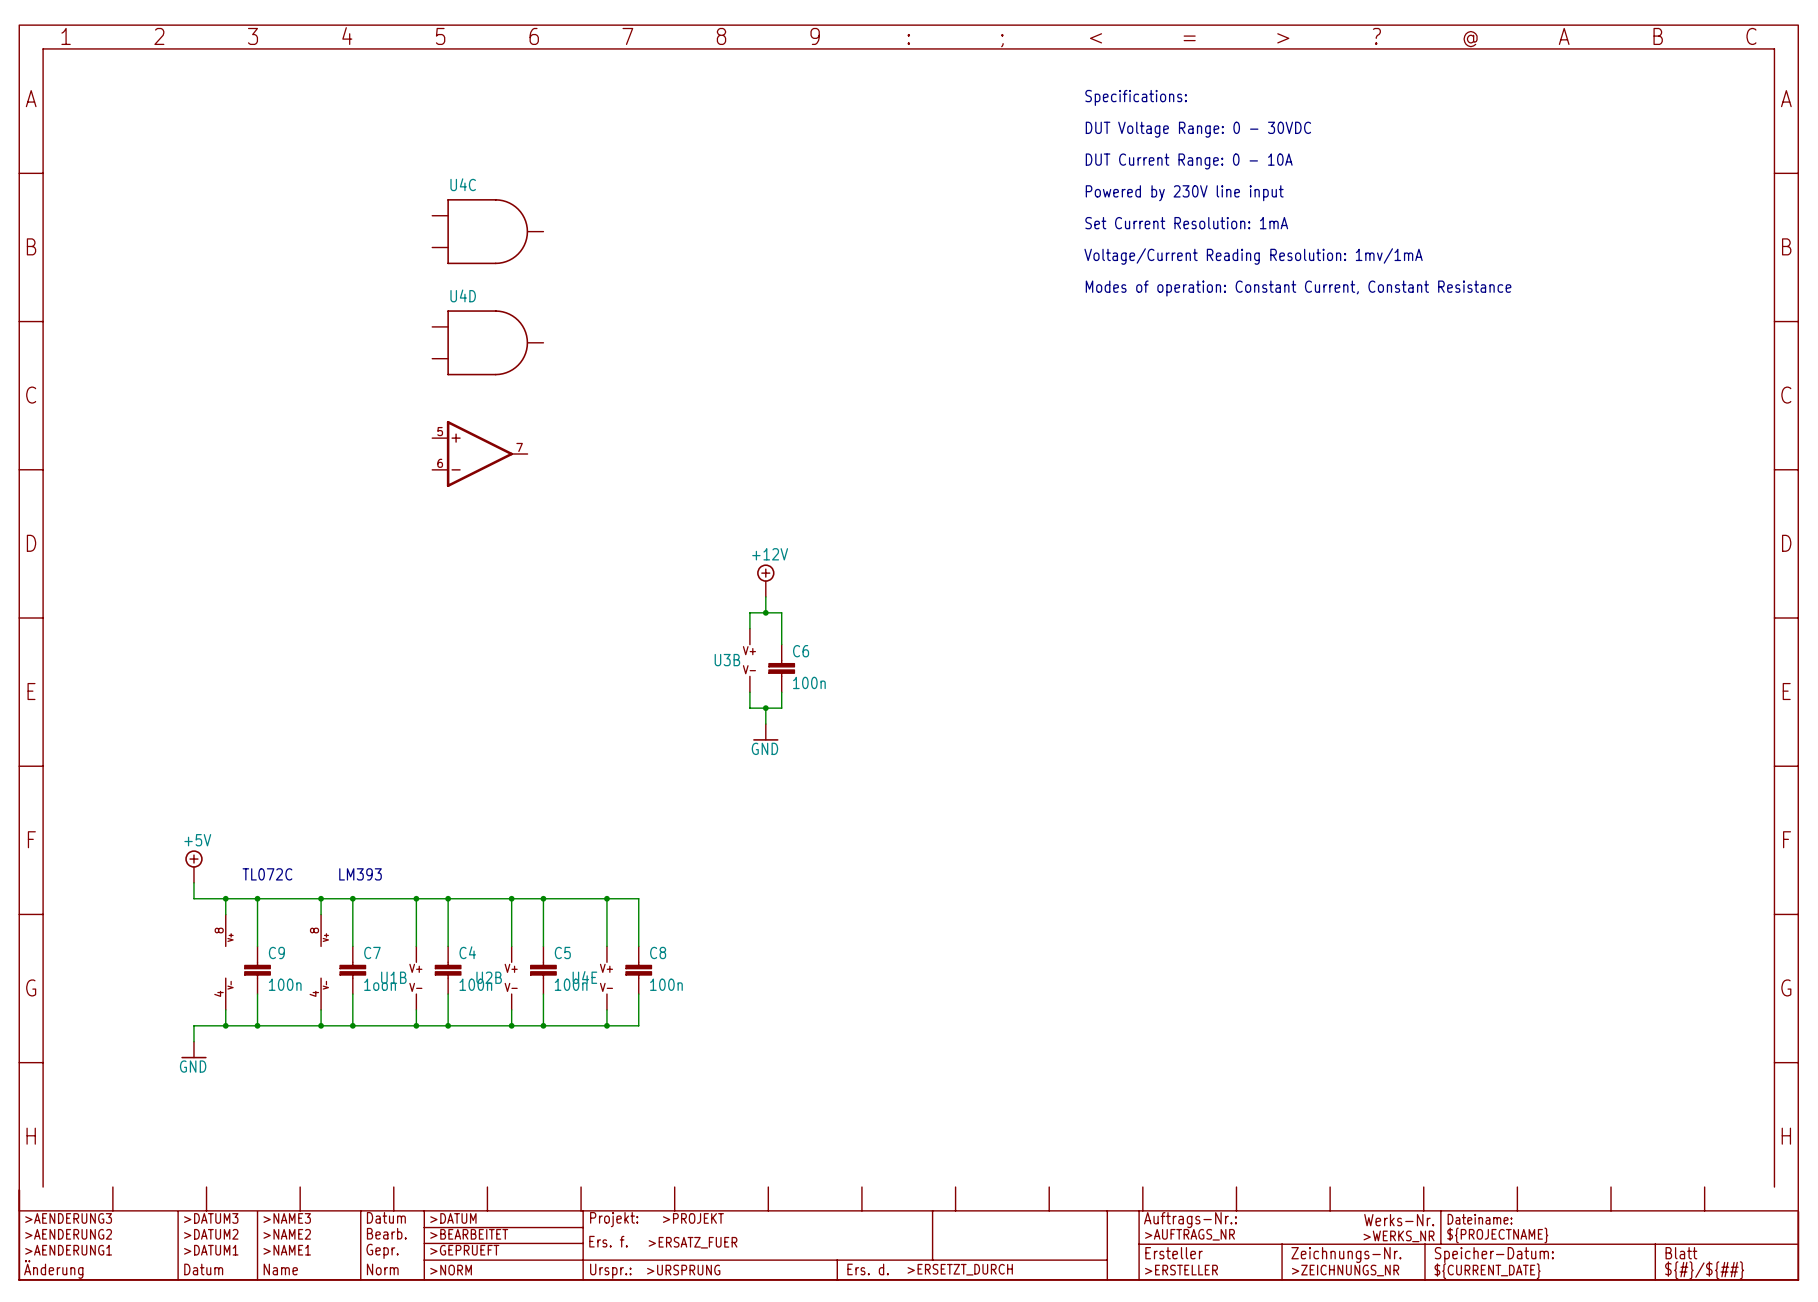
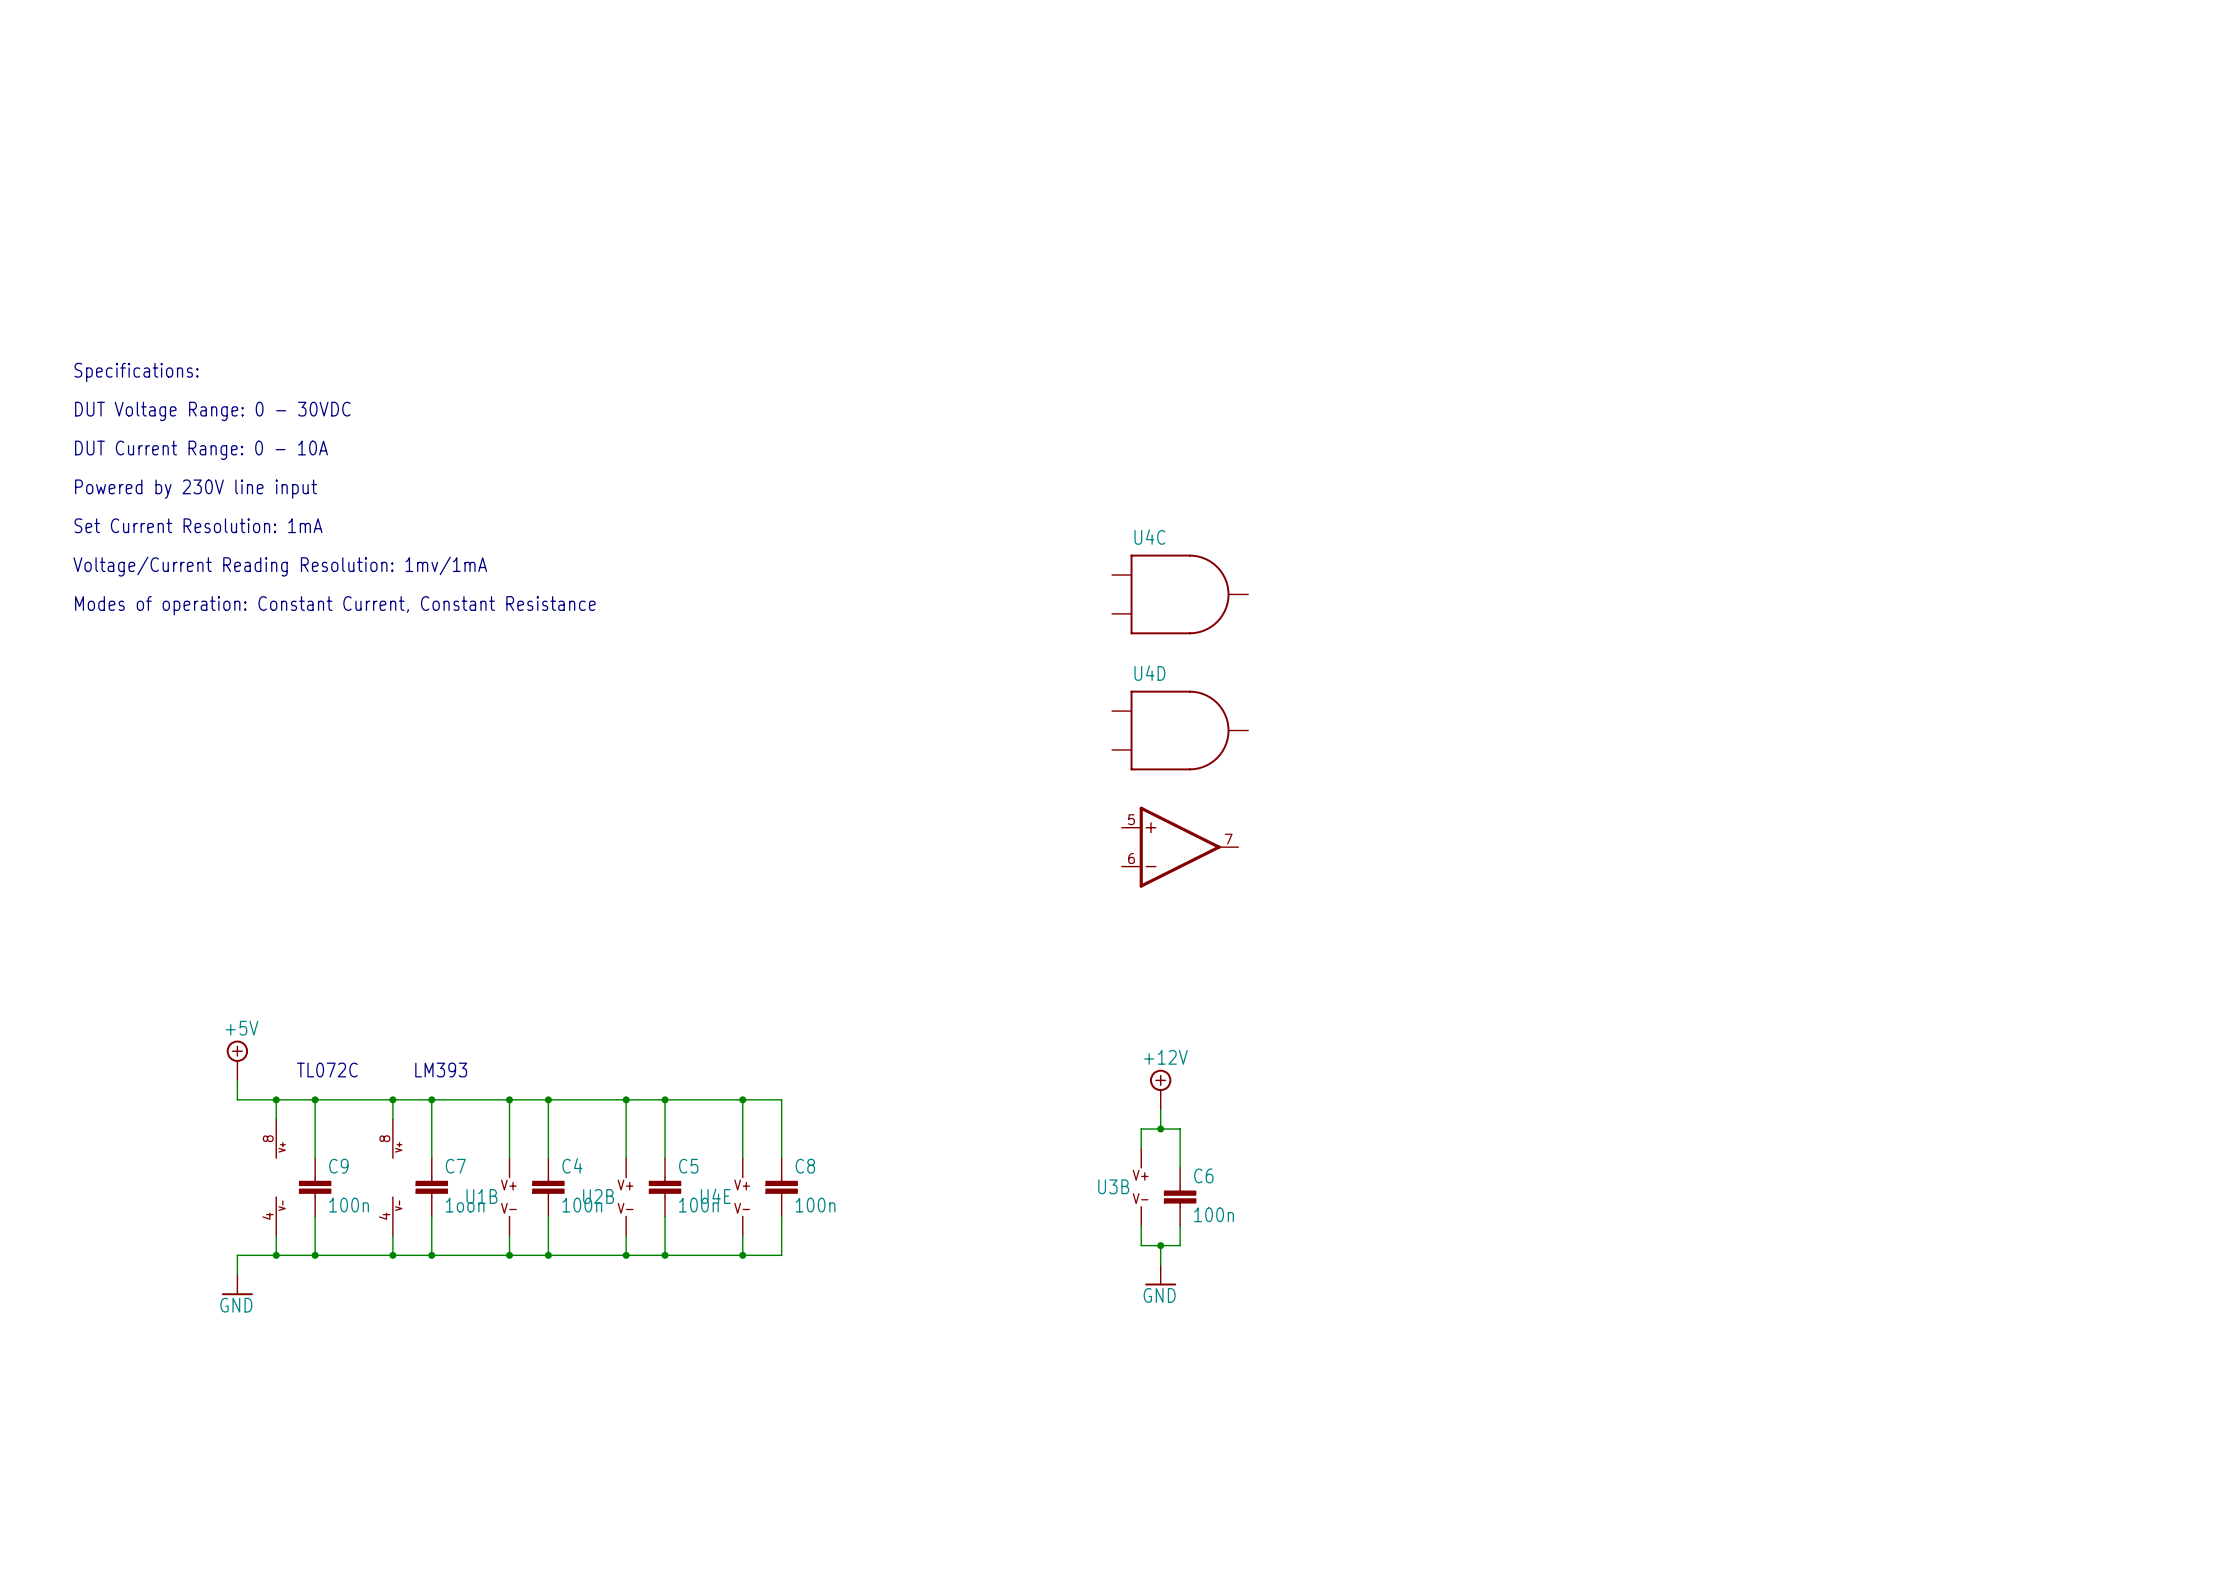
drawing: [18, 25, 1800, 1281] -> none
text: Specifications: (1136, 97) -> none
text: DUT Voltage Range: 0 - 30VDC (1198, 129) -> none
text: DUT Current Range: 0 - 10A (1189, 161) -> none
text: Powered by 230V line input (1184, 193) -> none
text: Set Current Resolution: 1mA (1186, 223) -> none
U4C position: (487, 231) -> (1180, 594)
text: Voltage/Current Reading Resolution: 1mv/1mA (1253, 256) -> none
text: Modes of operation: Constant Current, Constant Resistance (1298, 288) -> none
text: none -> Specifications: (136, 372)
text: none -> DUT Voltage Range: 0 - 30VDC (212, 411)
U4D position: (487, 342) -> (1180, 730)
text: none -> DUT Current Range: 0 - 10A (201, 450)
text: none -> Powered by 230V line input (196, 489)
text: none -> Set Current Resolution: 1mA (198, 525)
part: (479, 453) -> none
text: none -> Voltage/Current Reading Resolution: 1mv/1mA (280, 566)
text: none -> Modes of operation: Constant Current, Constant Resistance (335, 605)
power symbol: +12V (765, 580) -> none
wire: (765, 596) (765, 612) -> none
junction: (765, 612) -> none
wire: (749, 628) (749, 612) (781, 612) (781, 644) -> none
U3B position: (749, 660) -> (1141, 1187)
C6 position: (781, 668) -> (1180, 1197)
wire: (749, 692) (749, 708) (781, 708) (781, 692) -> none
part: none -> (1180, 847)
wire: (765, 708) (765, 724) -> none
junction: (765, 708) -> none
power symbol: GND (765, 732) -> none
power symbol: none -> +12V (1160, 1089)
wire: none -> (1160, 1109) (1160, 1128)
junction: none -> (1160, 1128)
wire: none -> (1141, 1148) (1141, 1128) (1180, 1128) (1180, 1167)
wire: none -> (1141, 1226) (1141, 1245) (1180, 1245) (1180, 1226)
wire: none -> (1160, 1245) (1160, 1265)
junction: none -> (1160, 1245)
power symbol: none -> GND (1160, 1275)

